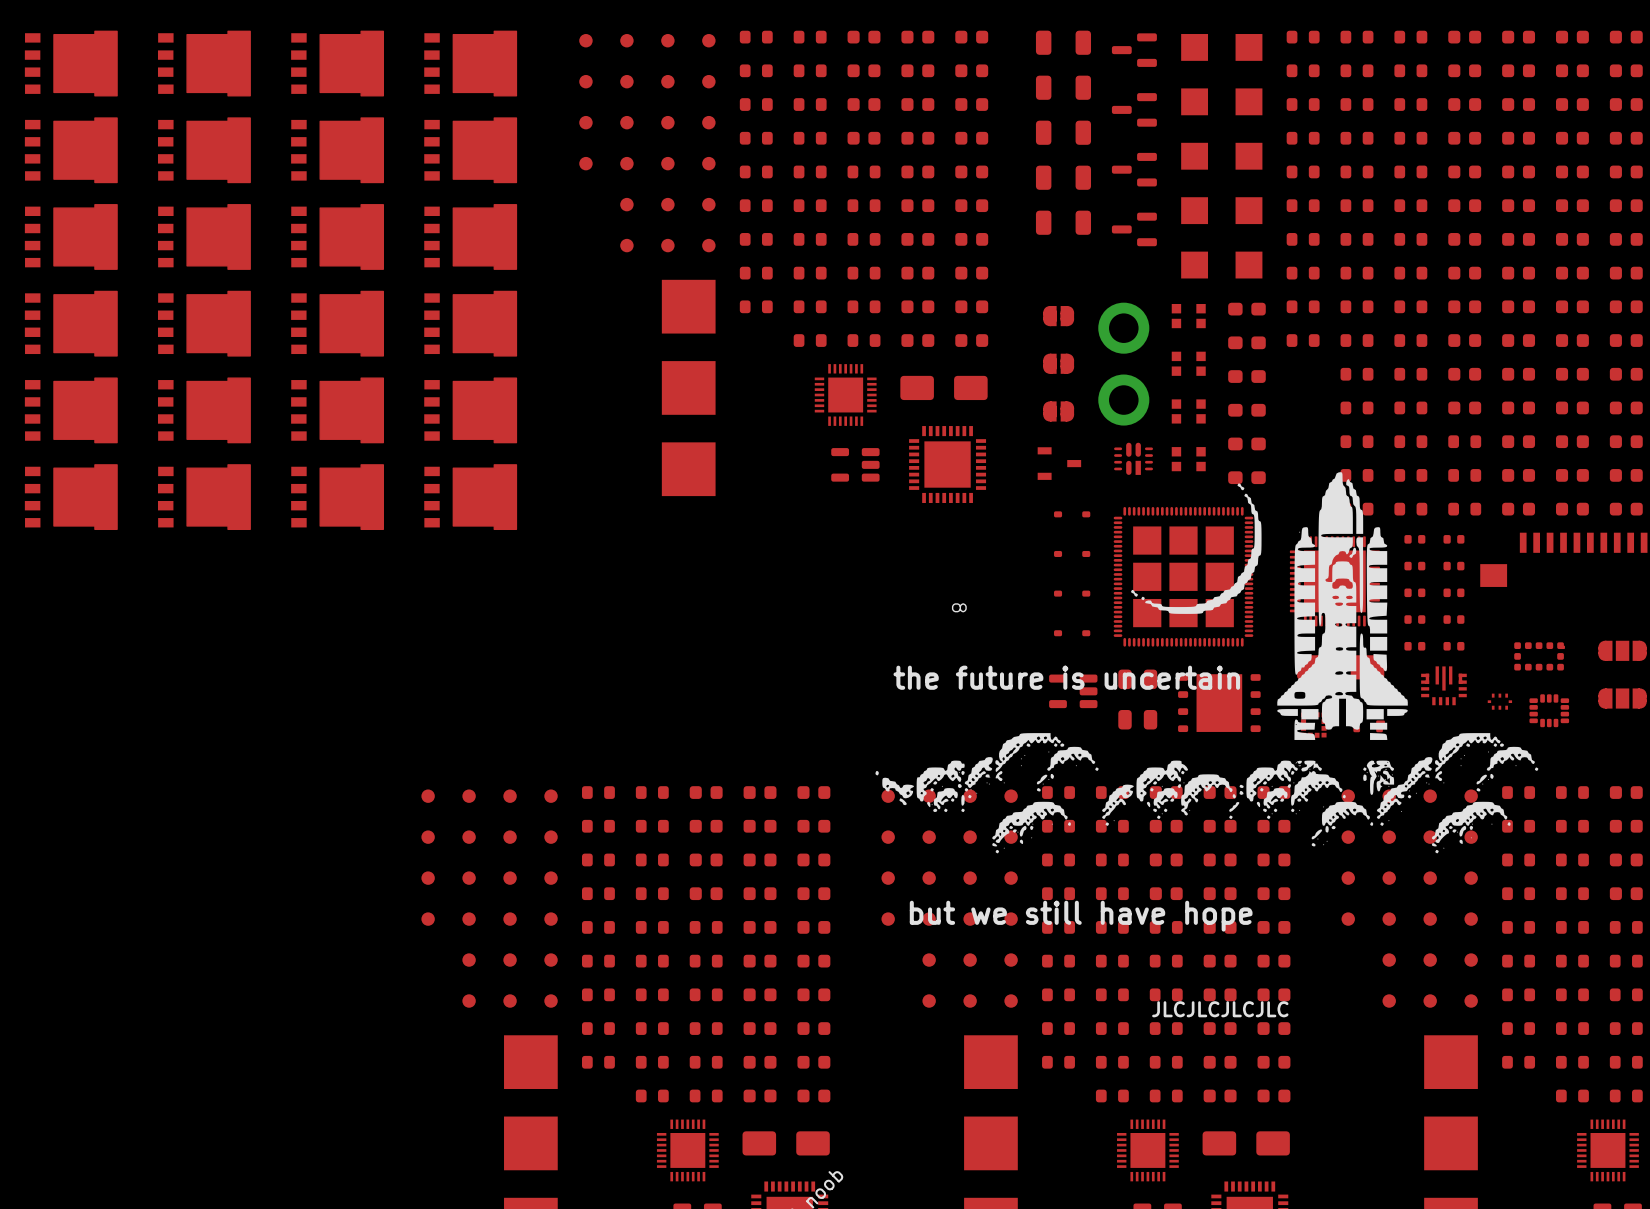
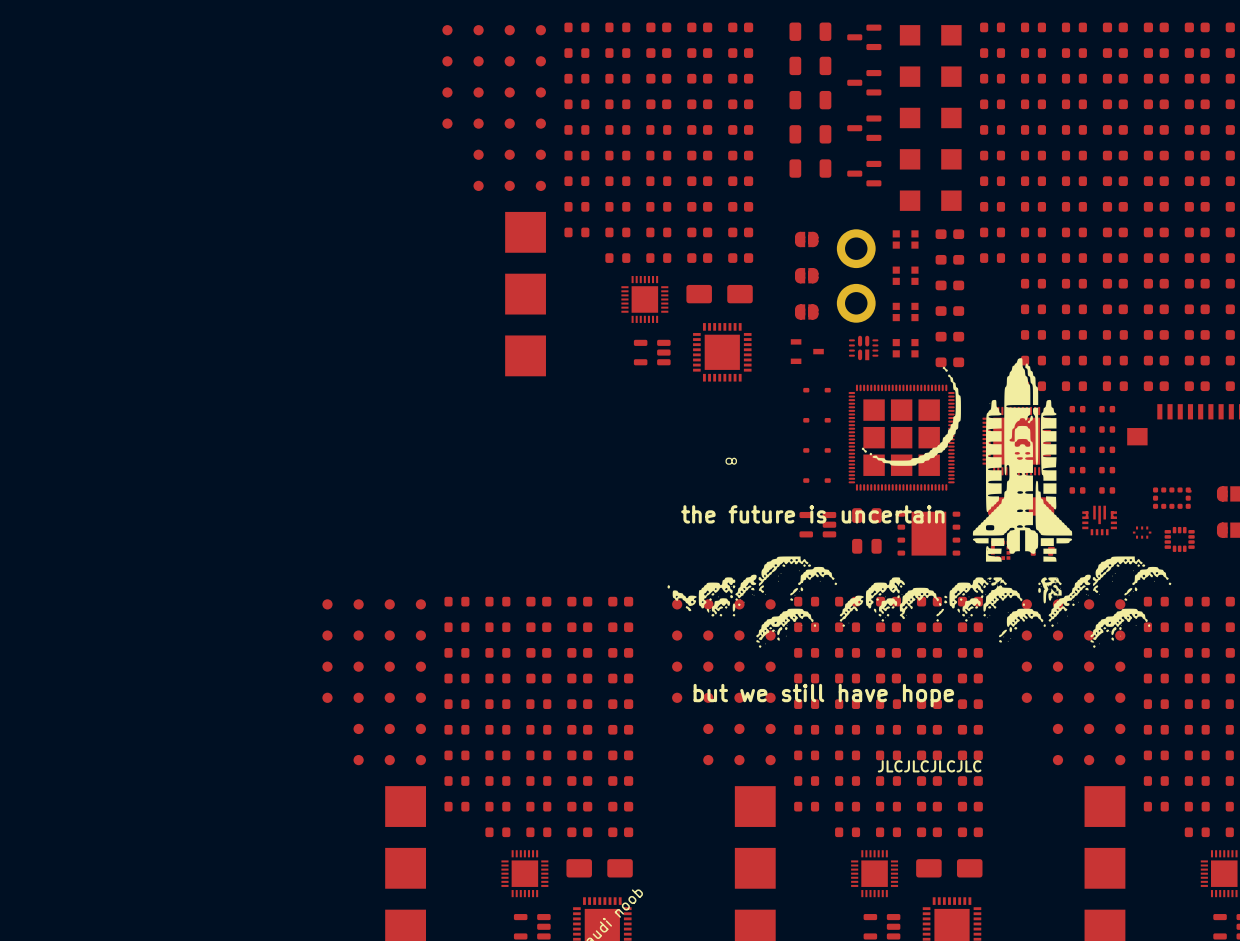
part: (71, 63) -> none
part: (204, 63) -> none
part: (337, 63) -> none
part: (470, 63) -> none
part: (71, 150) -> none
part: (204, 150) -> none
part: (337, 150) -> none
part: (470, 150) -> none
part: (71, 236) -> none
part: (204, 236) -> none
part: (337, 236) -> none
part: (470, 236) -> none
part: (71, 323) -> none
part: (204, 323) -> none
part: (337, 323) -> none
part: (470, 323) -> none
part: (71, 410) -> none
part: (204, 410) -> none
part: (337, 410) -> none
part: (470, 410) -> none
part: (71, 497) -> none
part: (204, 497) -> none
part: (337, 497) -> none
part: (470, 497) -> none

